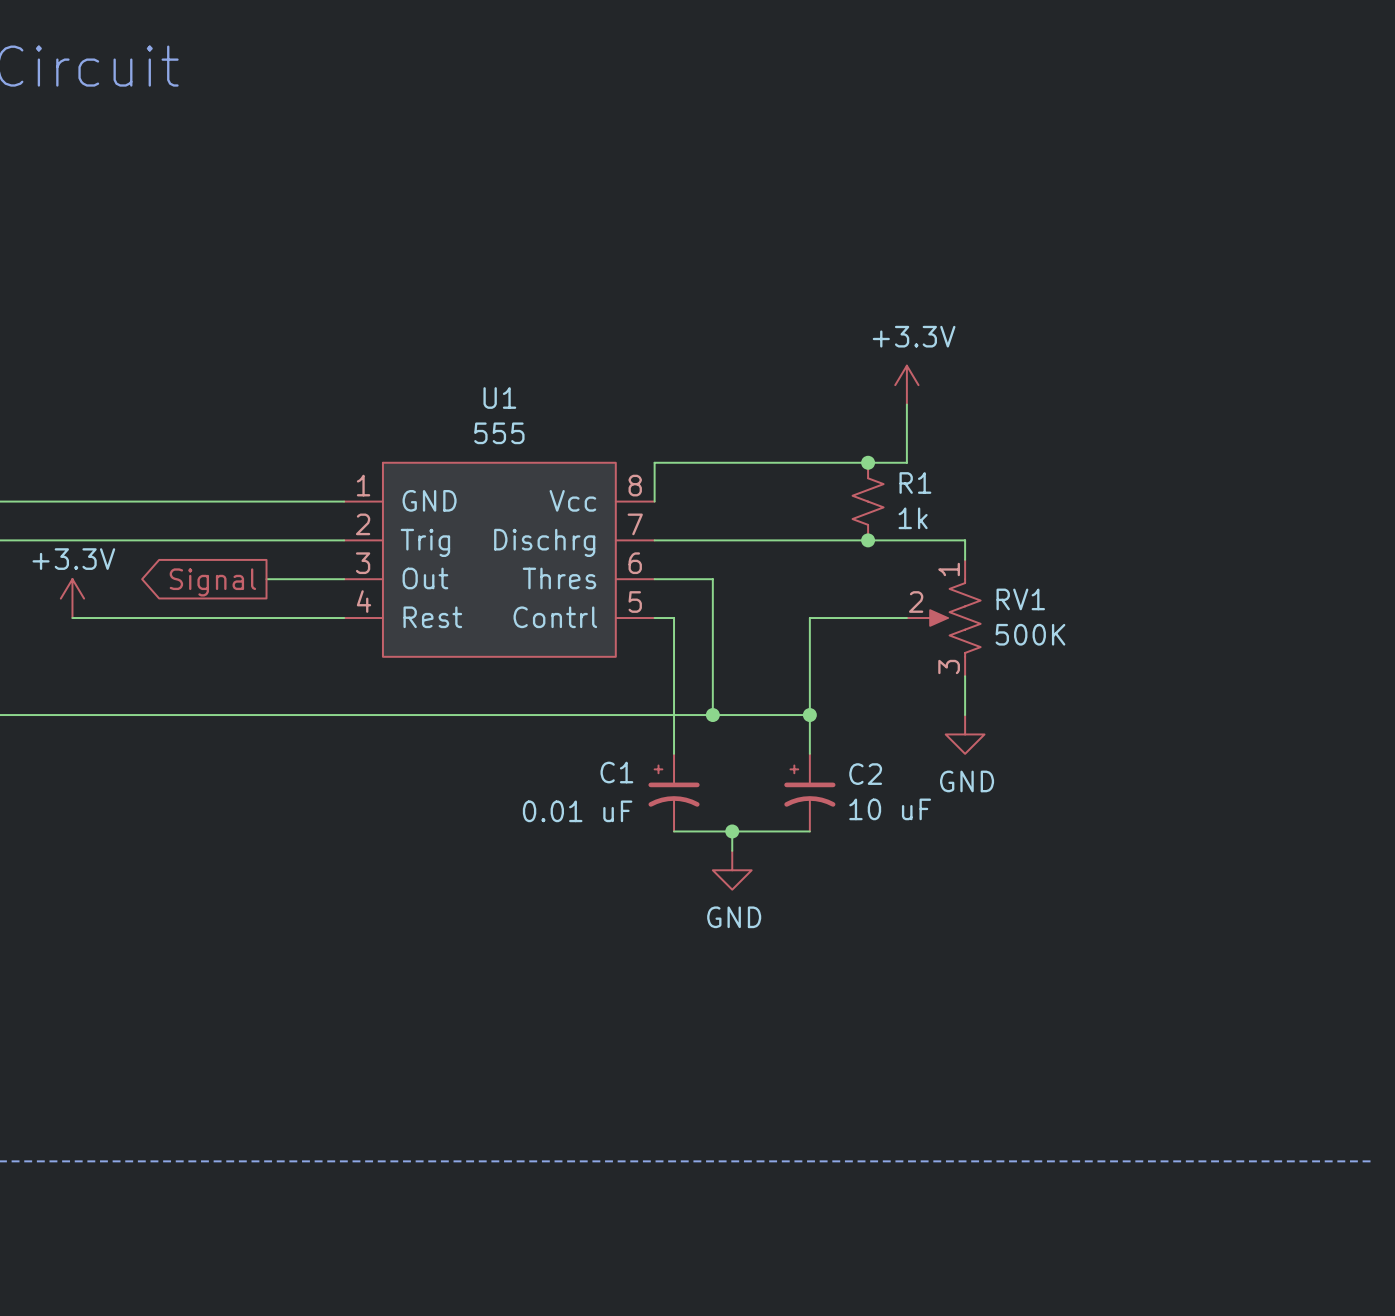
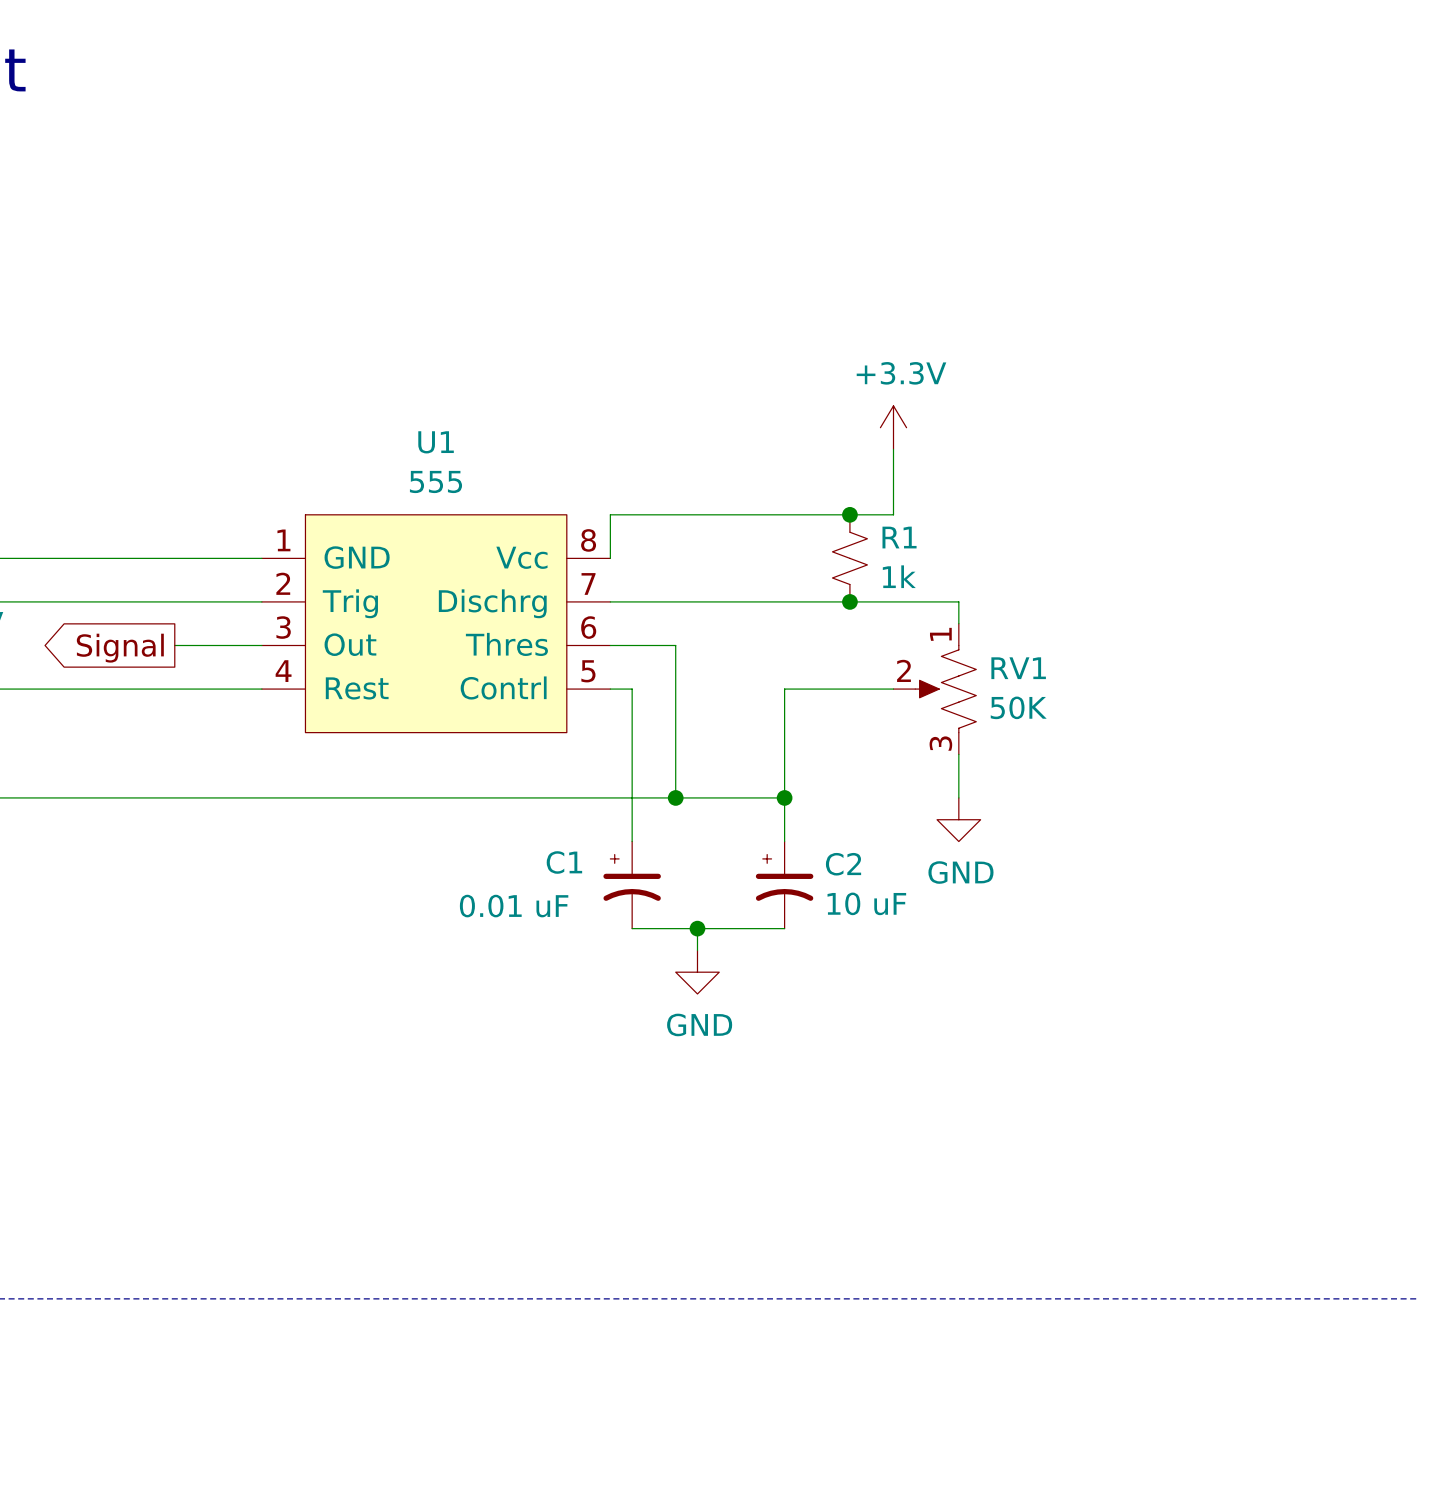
RV1 value: 500K (1030, 634) -> 50K (1018, 707)

